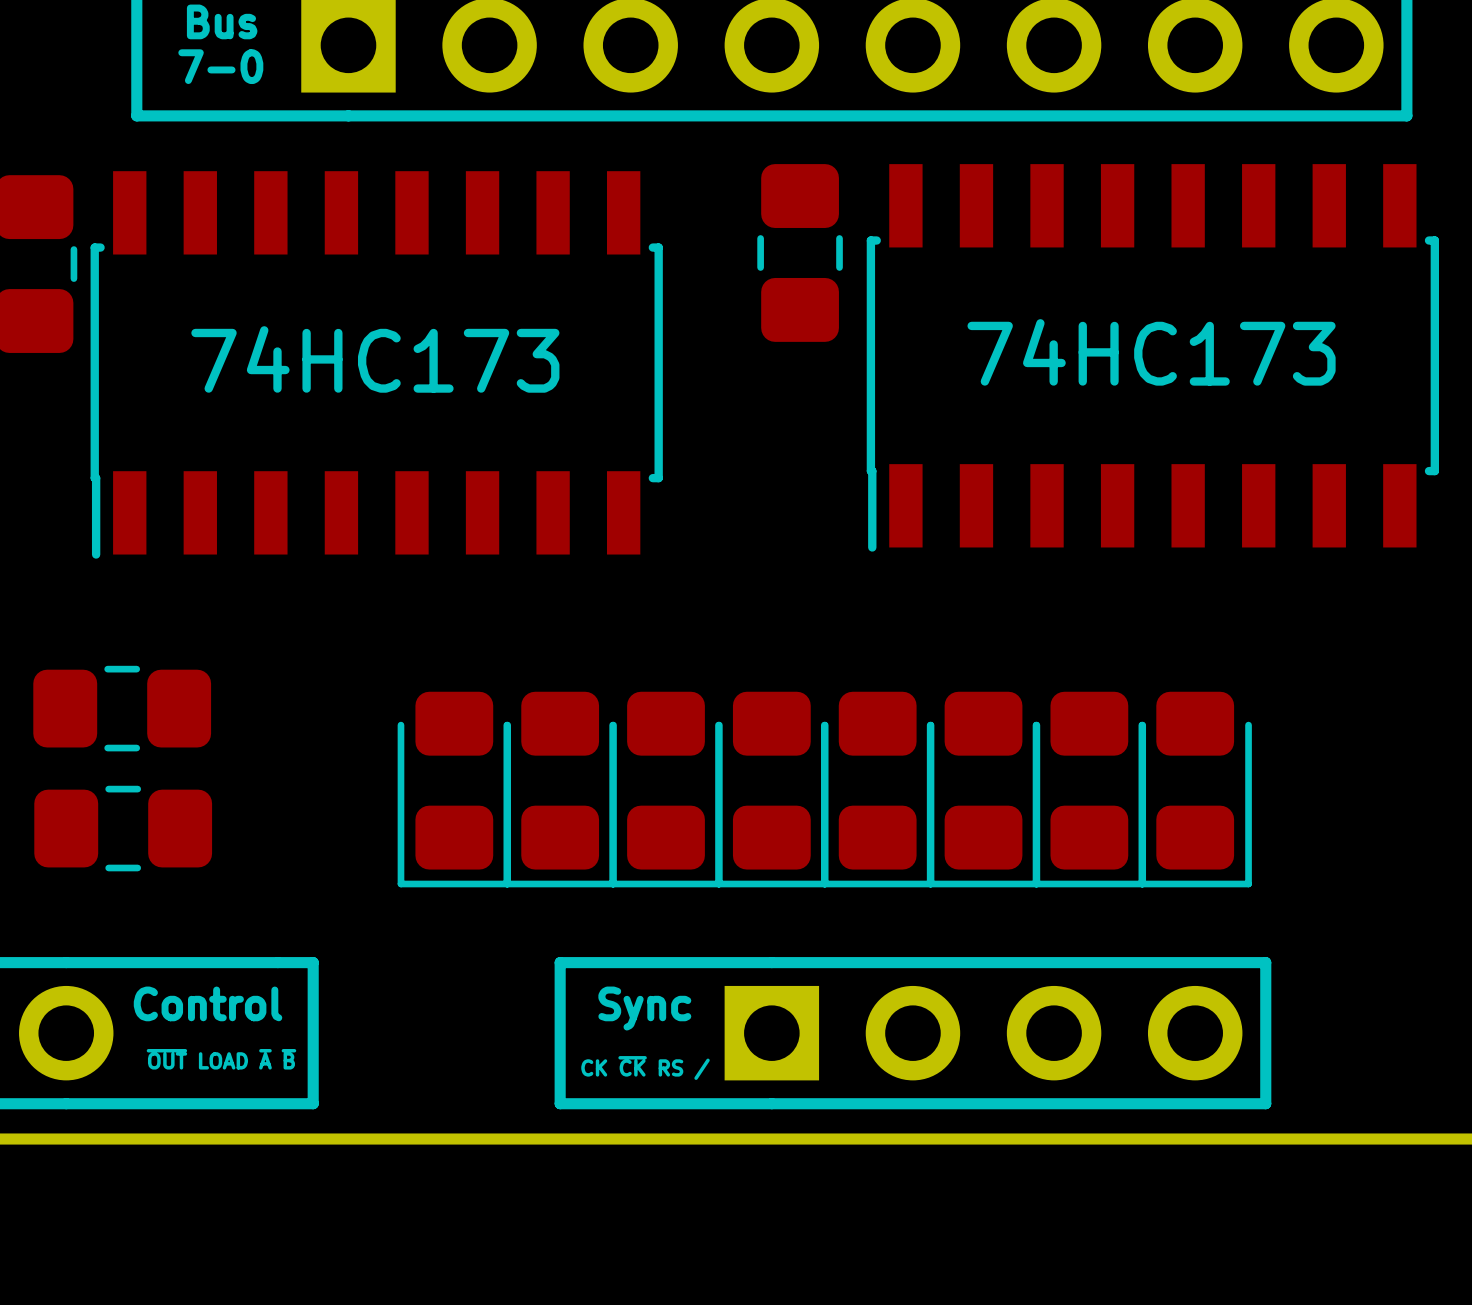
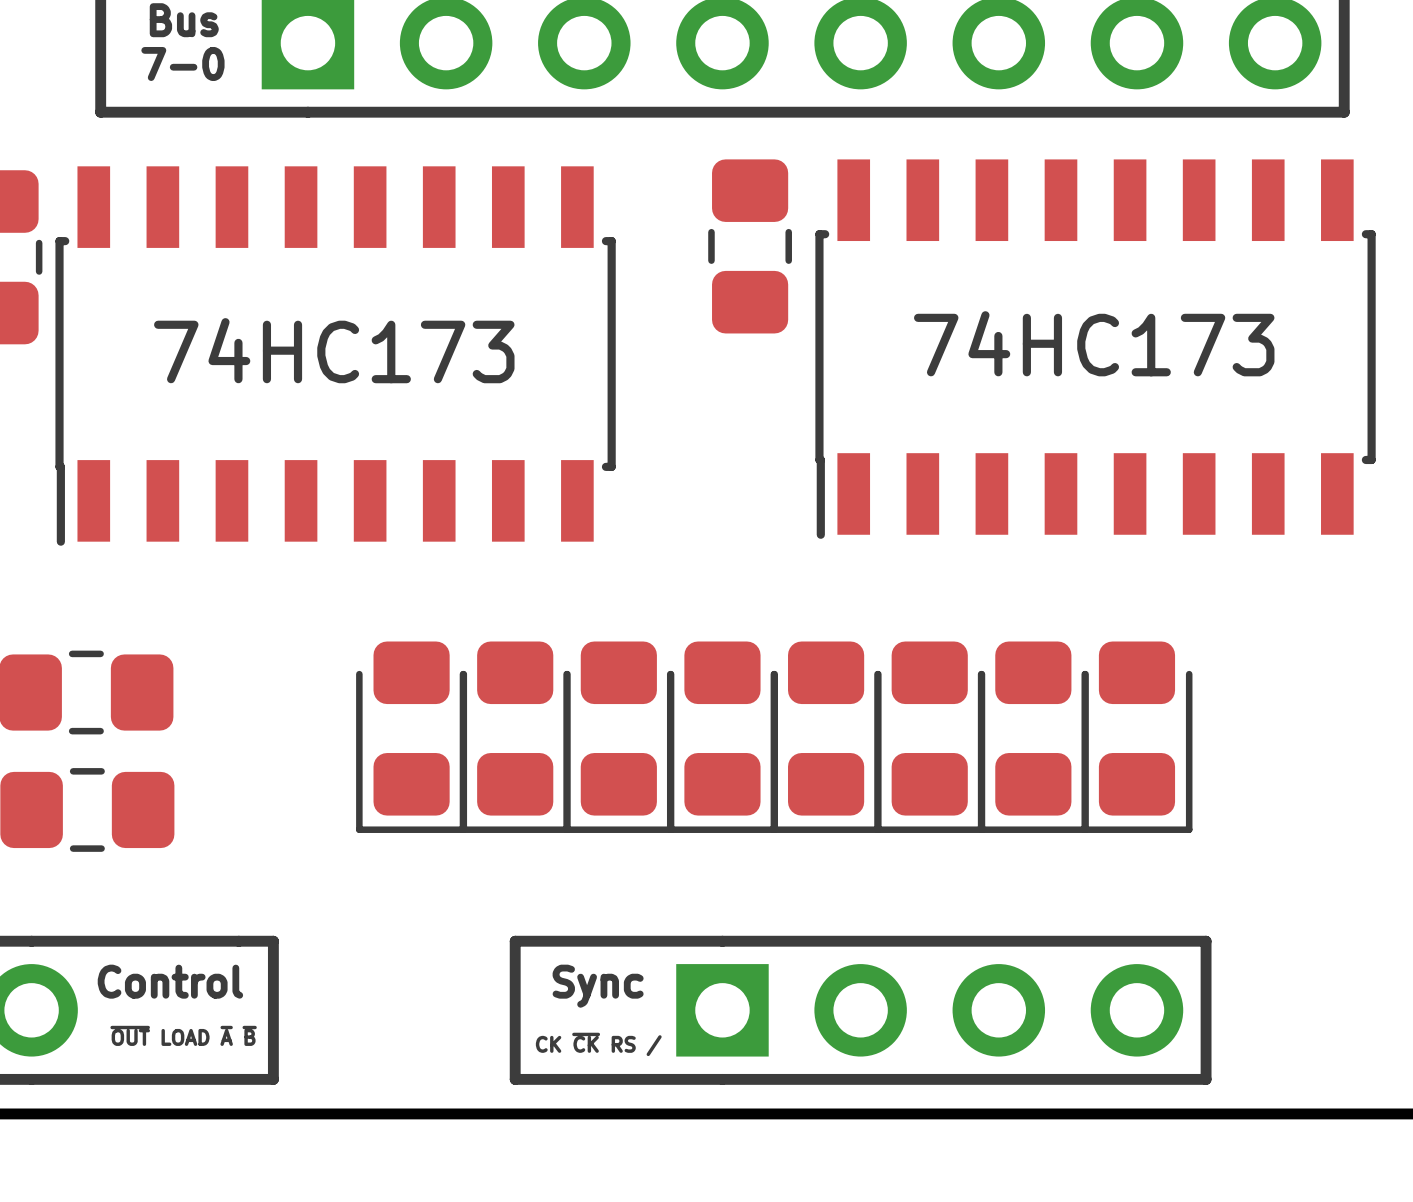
part position: (454, 789) -> (411, 737)
part position: (560, 789) -> (515, 737)
part position: (666, 789) -> (618, 737)
part position: (771, 789) -> (722, 737)
part position: (877, 789) -> (826, 737)
part position: (983, 789) -> (929, 737)
part position: (1089, 789) -> (1033, 737)
part position: (1195, 789) -> (1136, 737)

